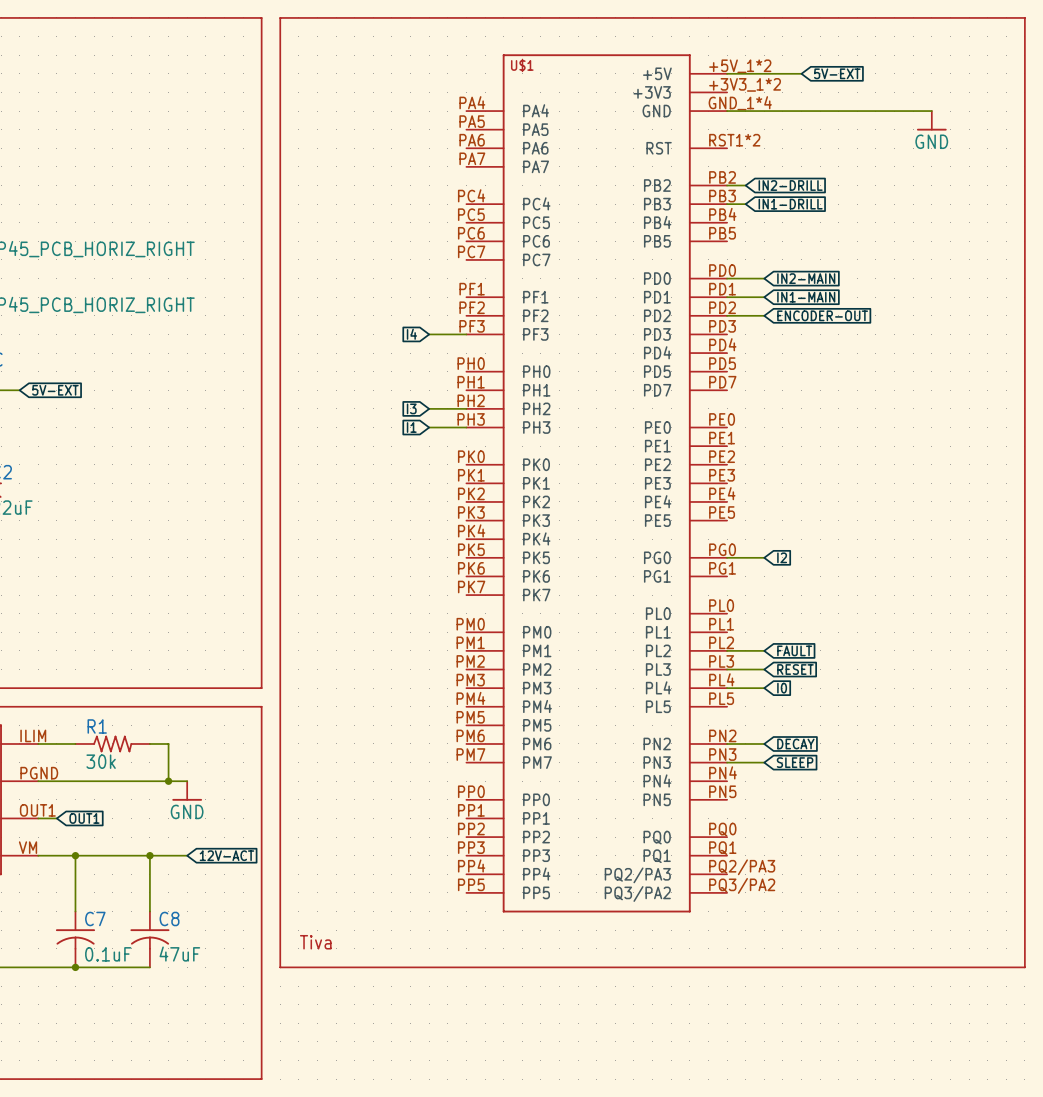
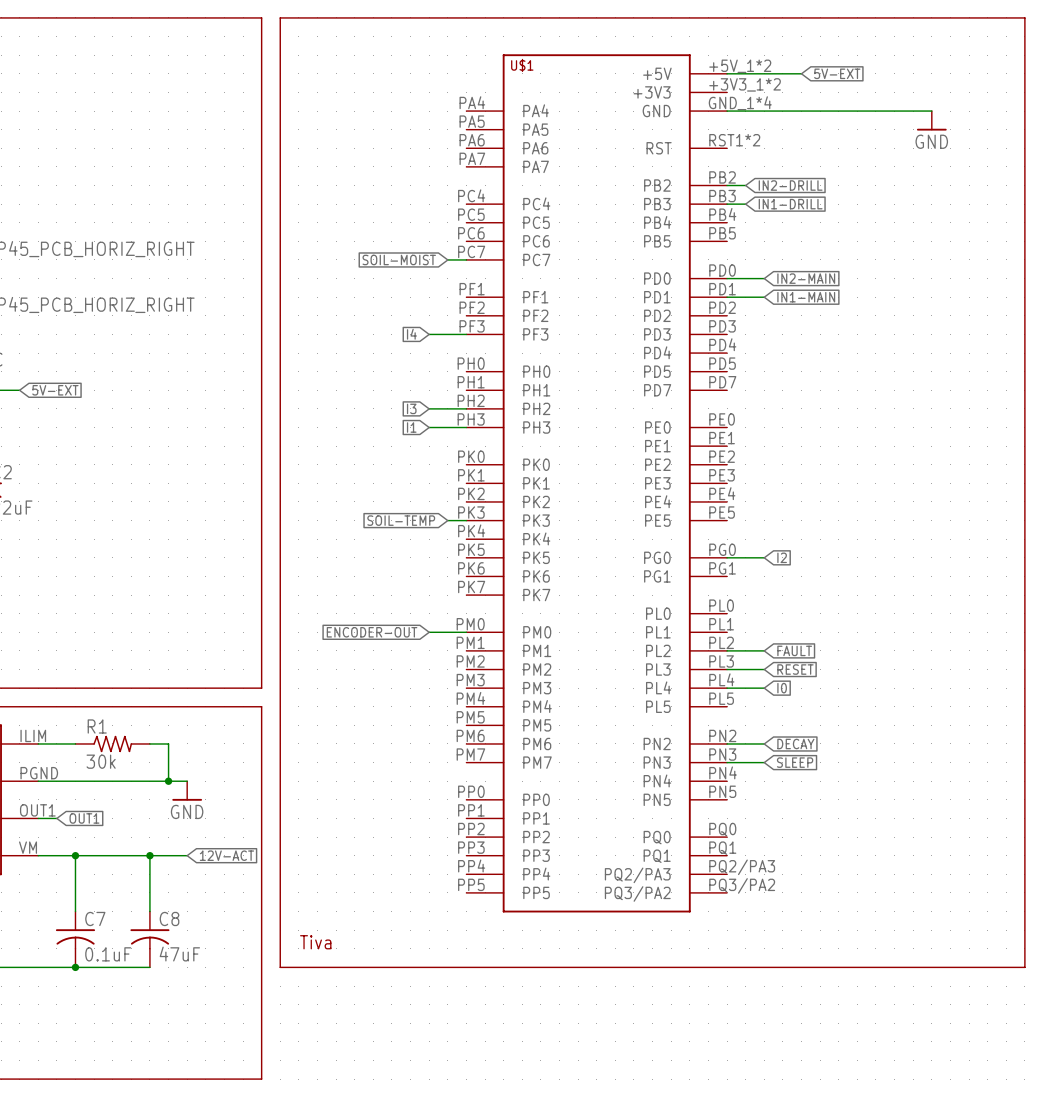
global label: none -> SOIL-MOIST (399, 259)
wire: none -> (447, 259) (466, 259)
wire: (727, 315) (764, 315) -> none
global label: ENCODER-OUT (822, 315) -> none
global label: none -> SOIL-TEMP (401, 520)
wire: none -> (447, 520) (466, 520)
global label: none -> ENCODER-OUT (372, 632)
wire: none -> (429, 632) (466, 632)

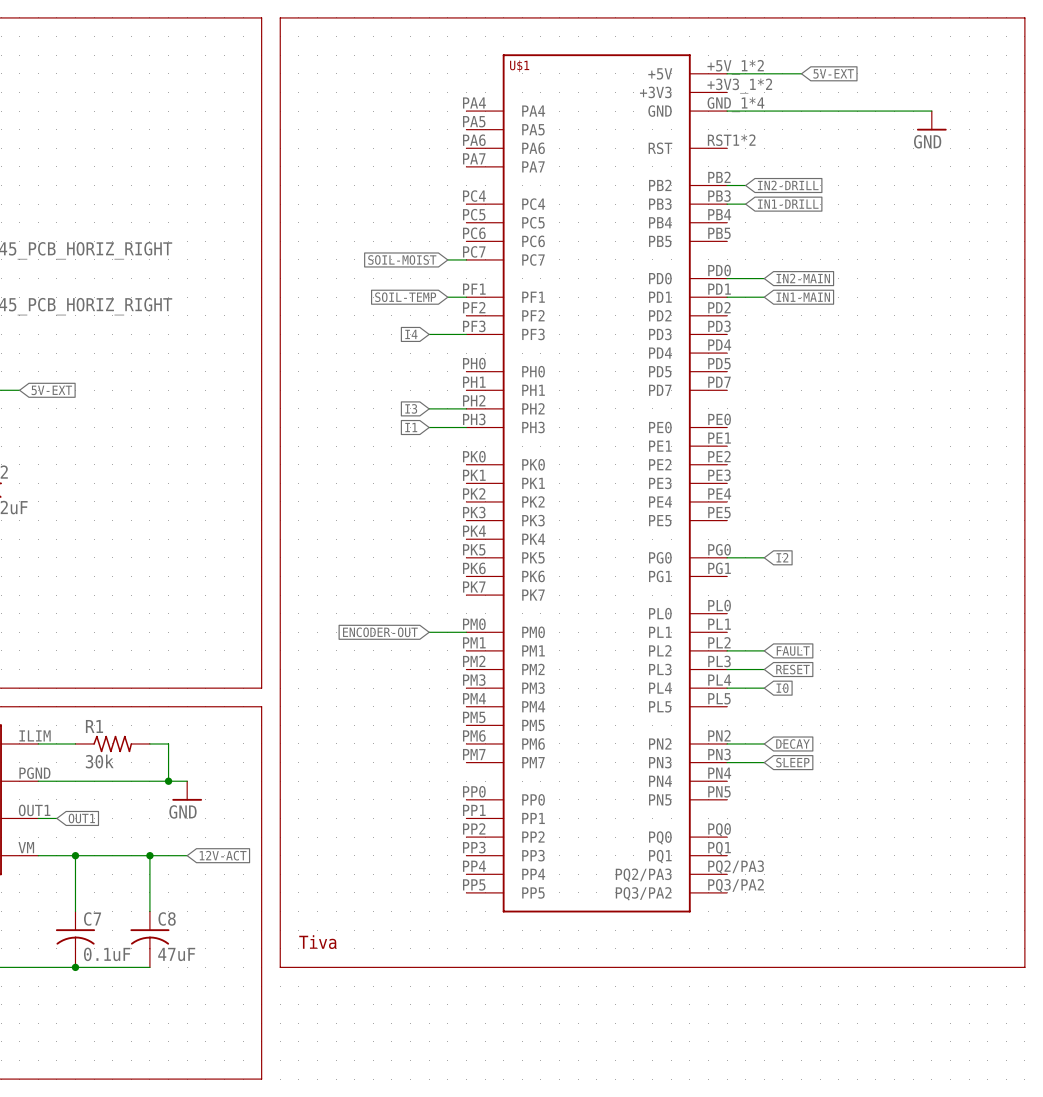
global label: none -> SOIL-TEMP (405, 297)
wire: none -> (447, 297) (466, 297)
global label: SOIL-TEMP (401, 520) -> none
wire: (447, 520) (466, 520) -> none

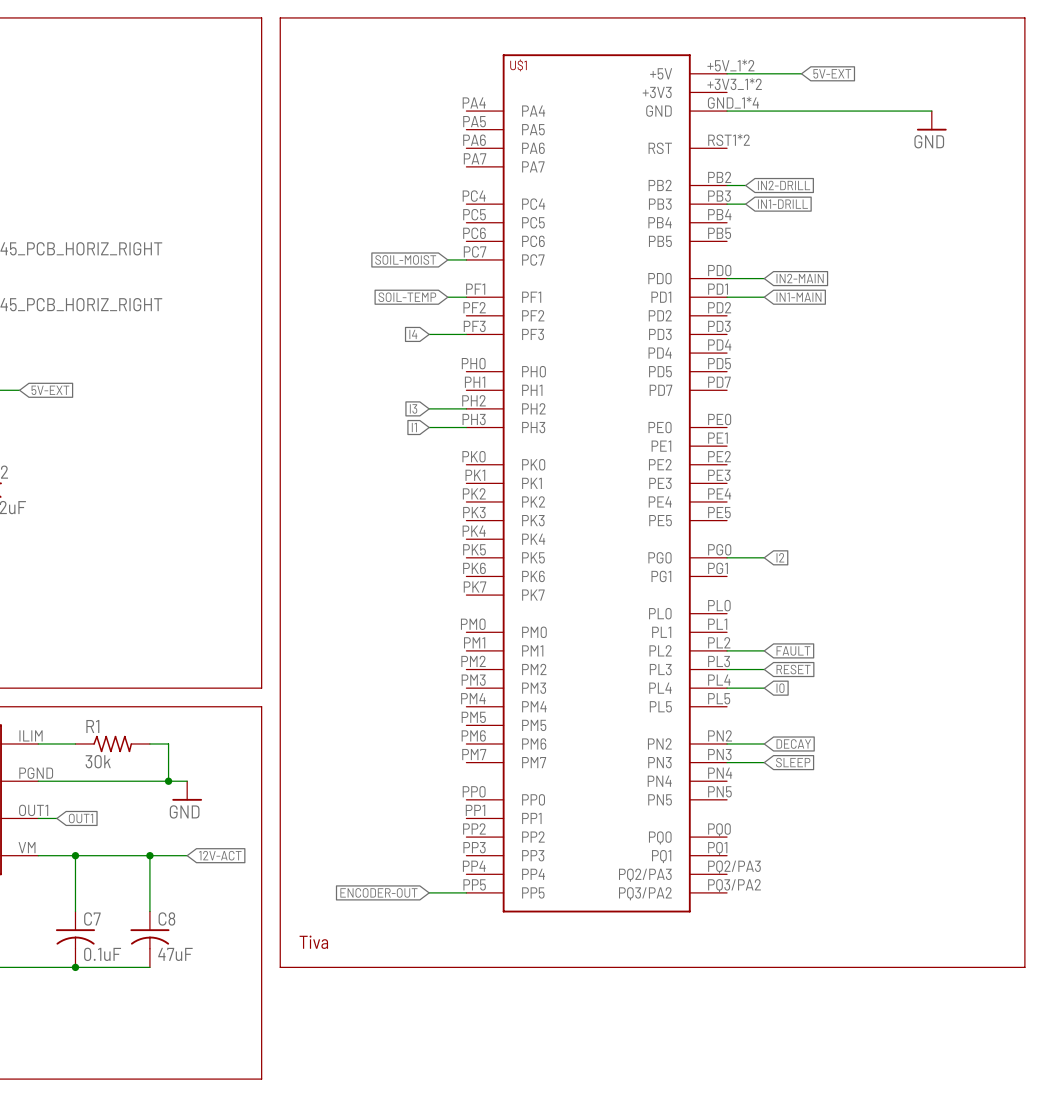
global label: ENCODER-OUT (380, 632) -> none
wire: (429, 632) (466, 632) -> none
global label: none -> ENCODER-OUT (378, 892)
wire: none -> (429, 892) (466, 892)

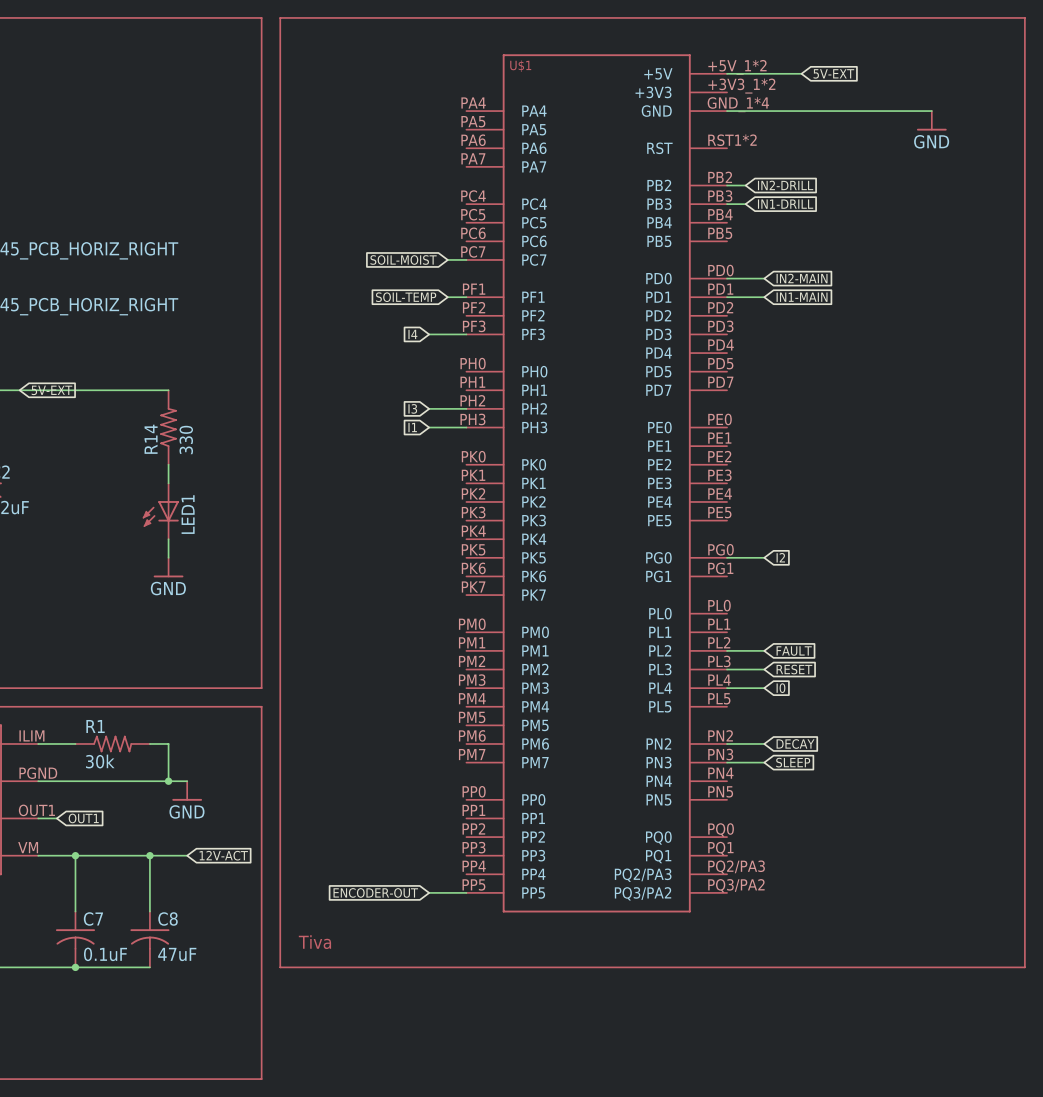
wire: none -> (19, 390) (168, 390)
R14: none -> 330 (168, 427)
wire: none -> (168, 464) (168, 483)
LED1: none -> (160, 511)
wire: none -> (168, 539) (168, 557)
power symbol: none -> GND (168, 567)

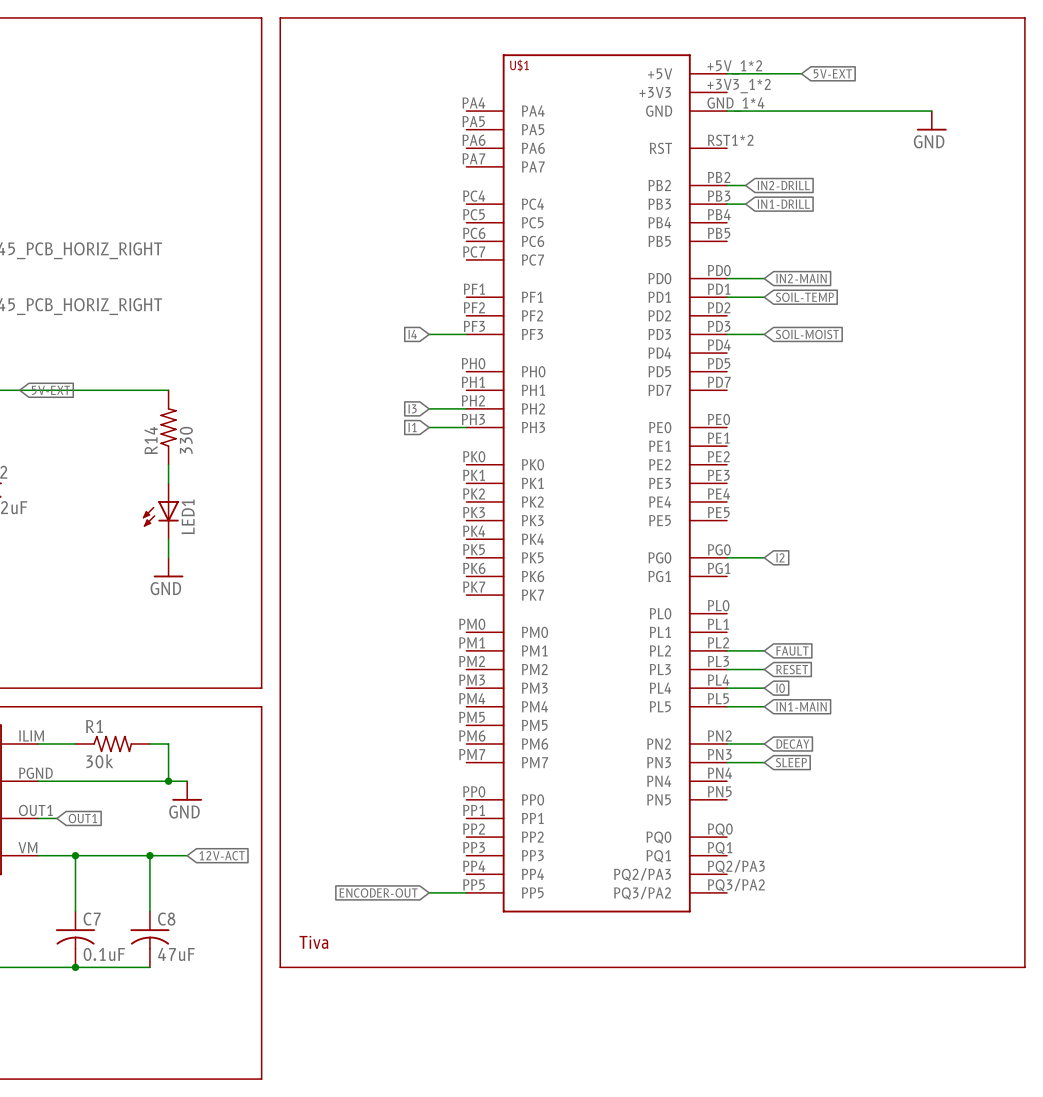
global label: SOIL-MOIST (403, 259) -> none
wire: (447, 259) (466, 259) -> none
global label: SOIL-TEMP (406, 297) -> none
wire: (447, 297) (466, 297) -> none
global label: IN1-MAIN (802, 297) -> SOIL-TEMP (804, 297)
wire: none -> (727, 334) (764, 334)
global label: none -> SOIL-MOIST (807, 334)
wire: none -> (727, 706) (764, 706)
global label: none -> IN1-MAIN (801, 706)

